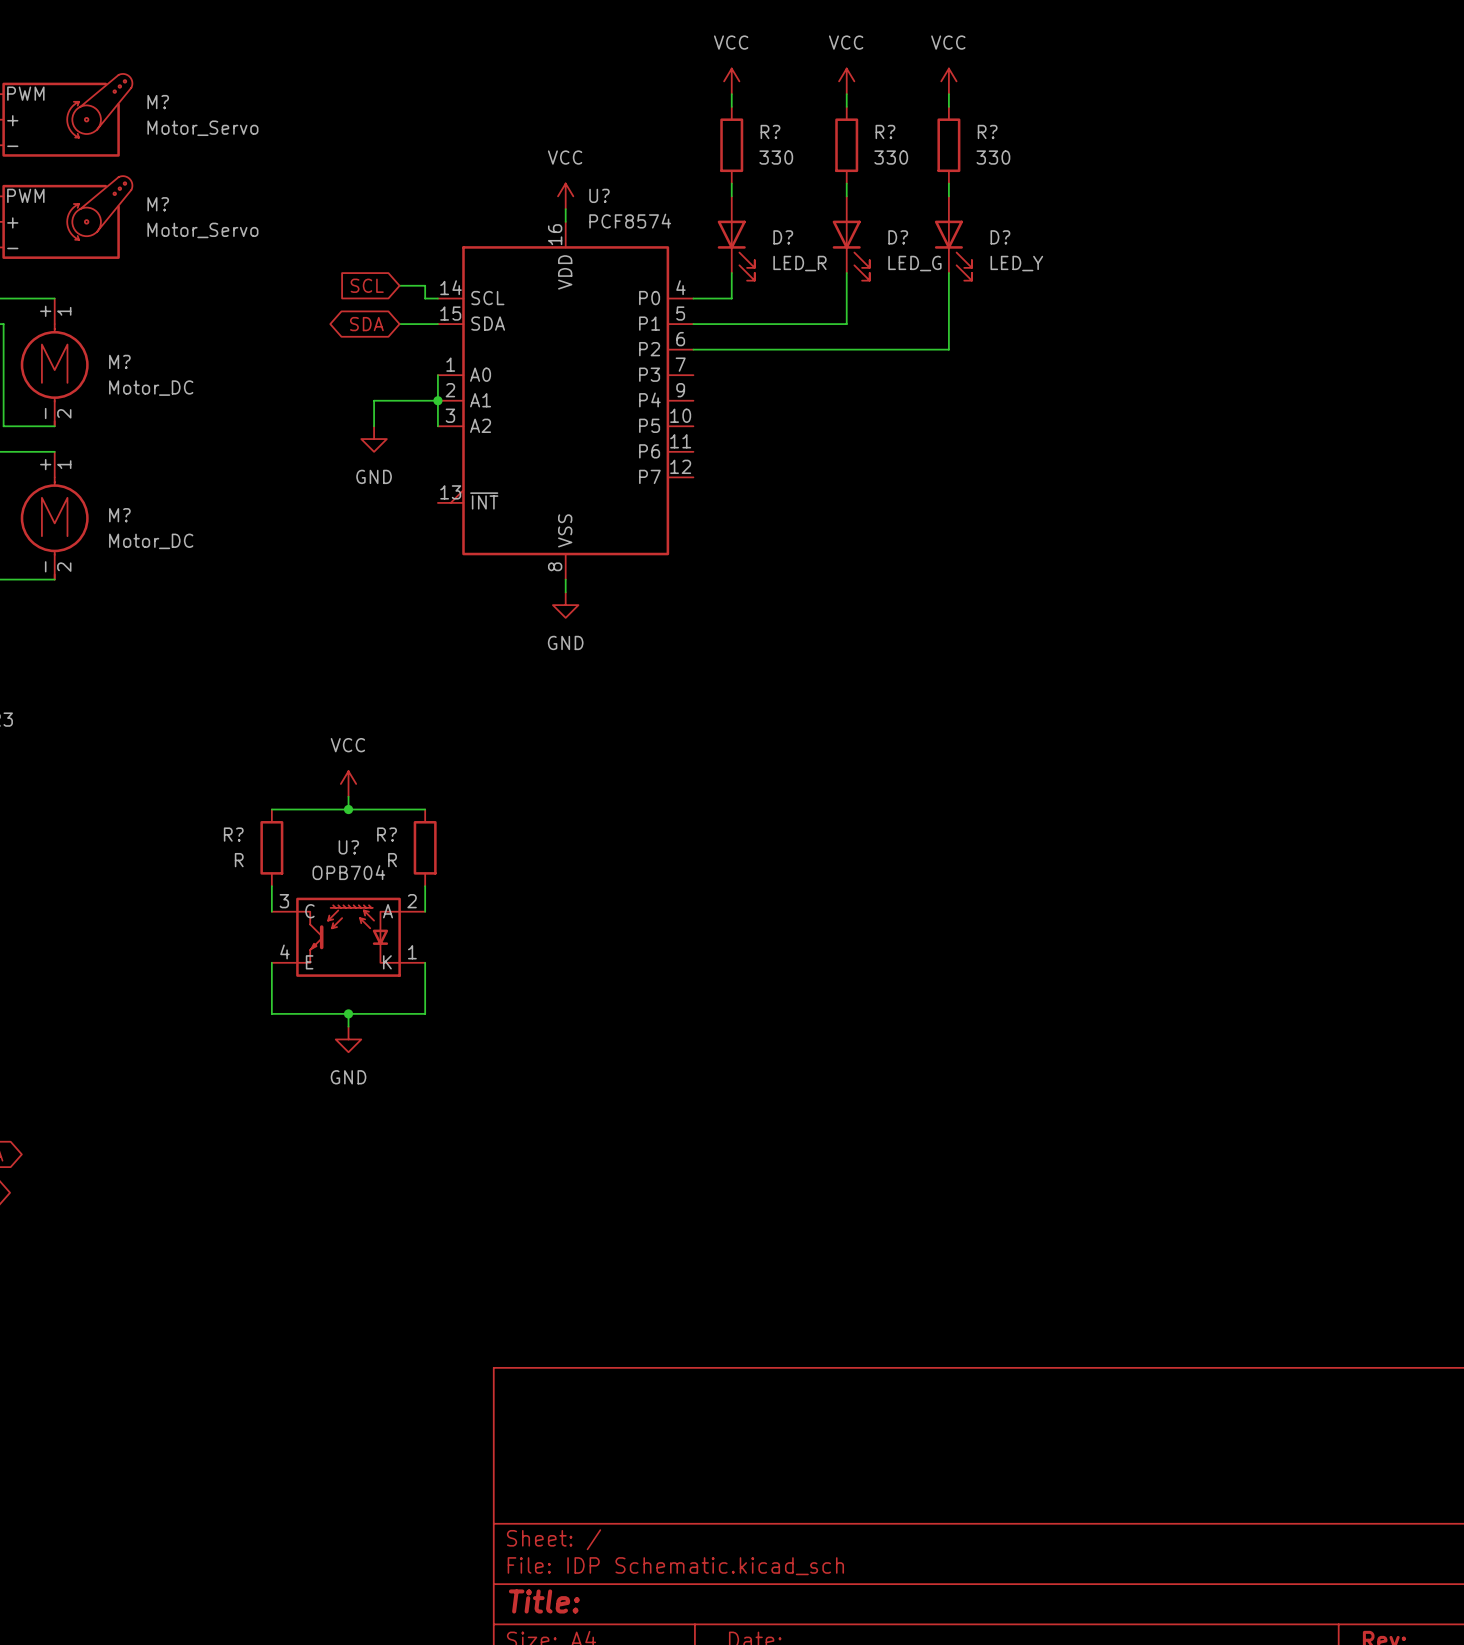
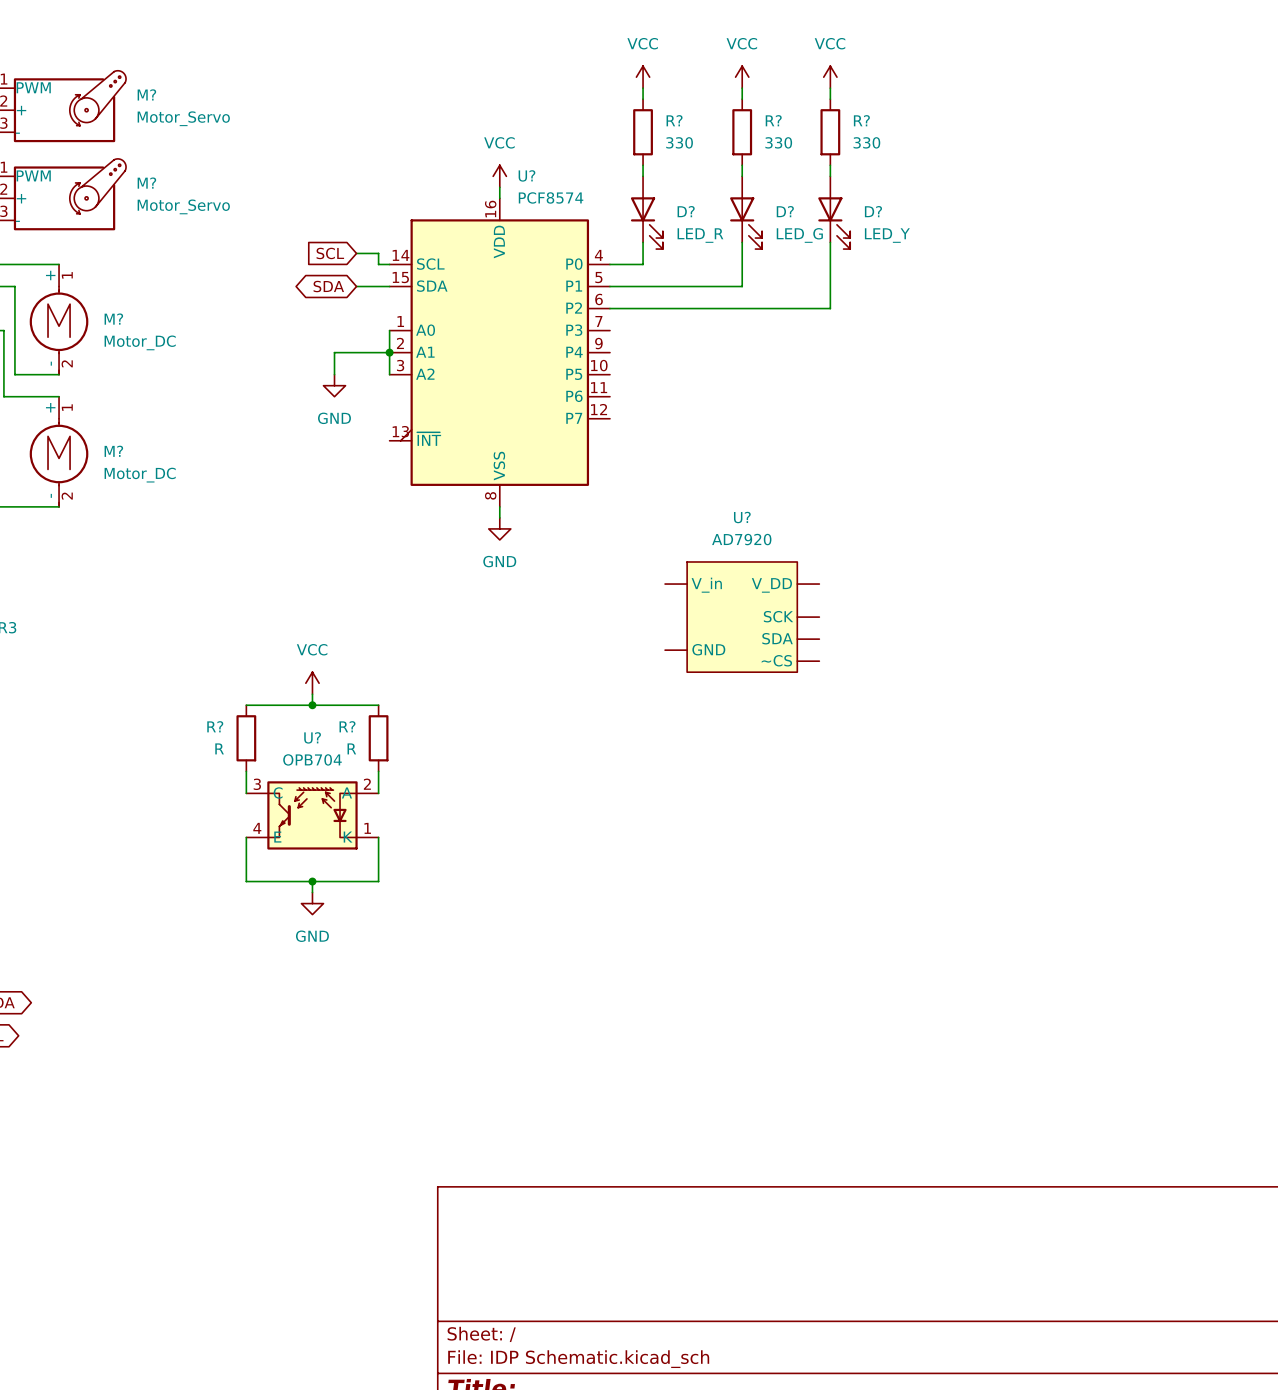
U?: none -> AD7920 (742, 617)

